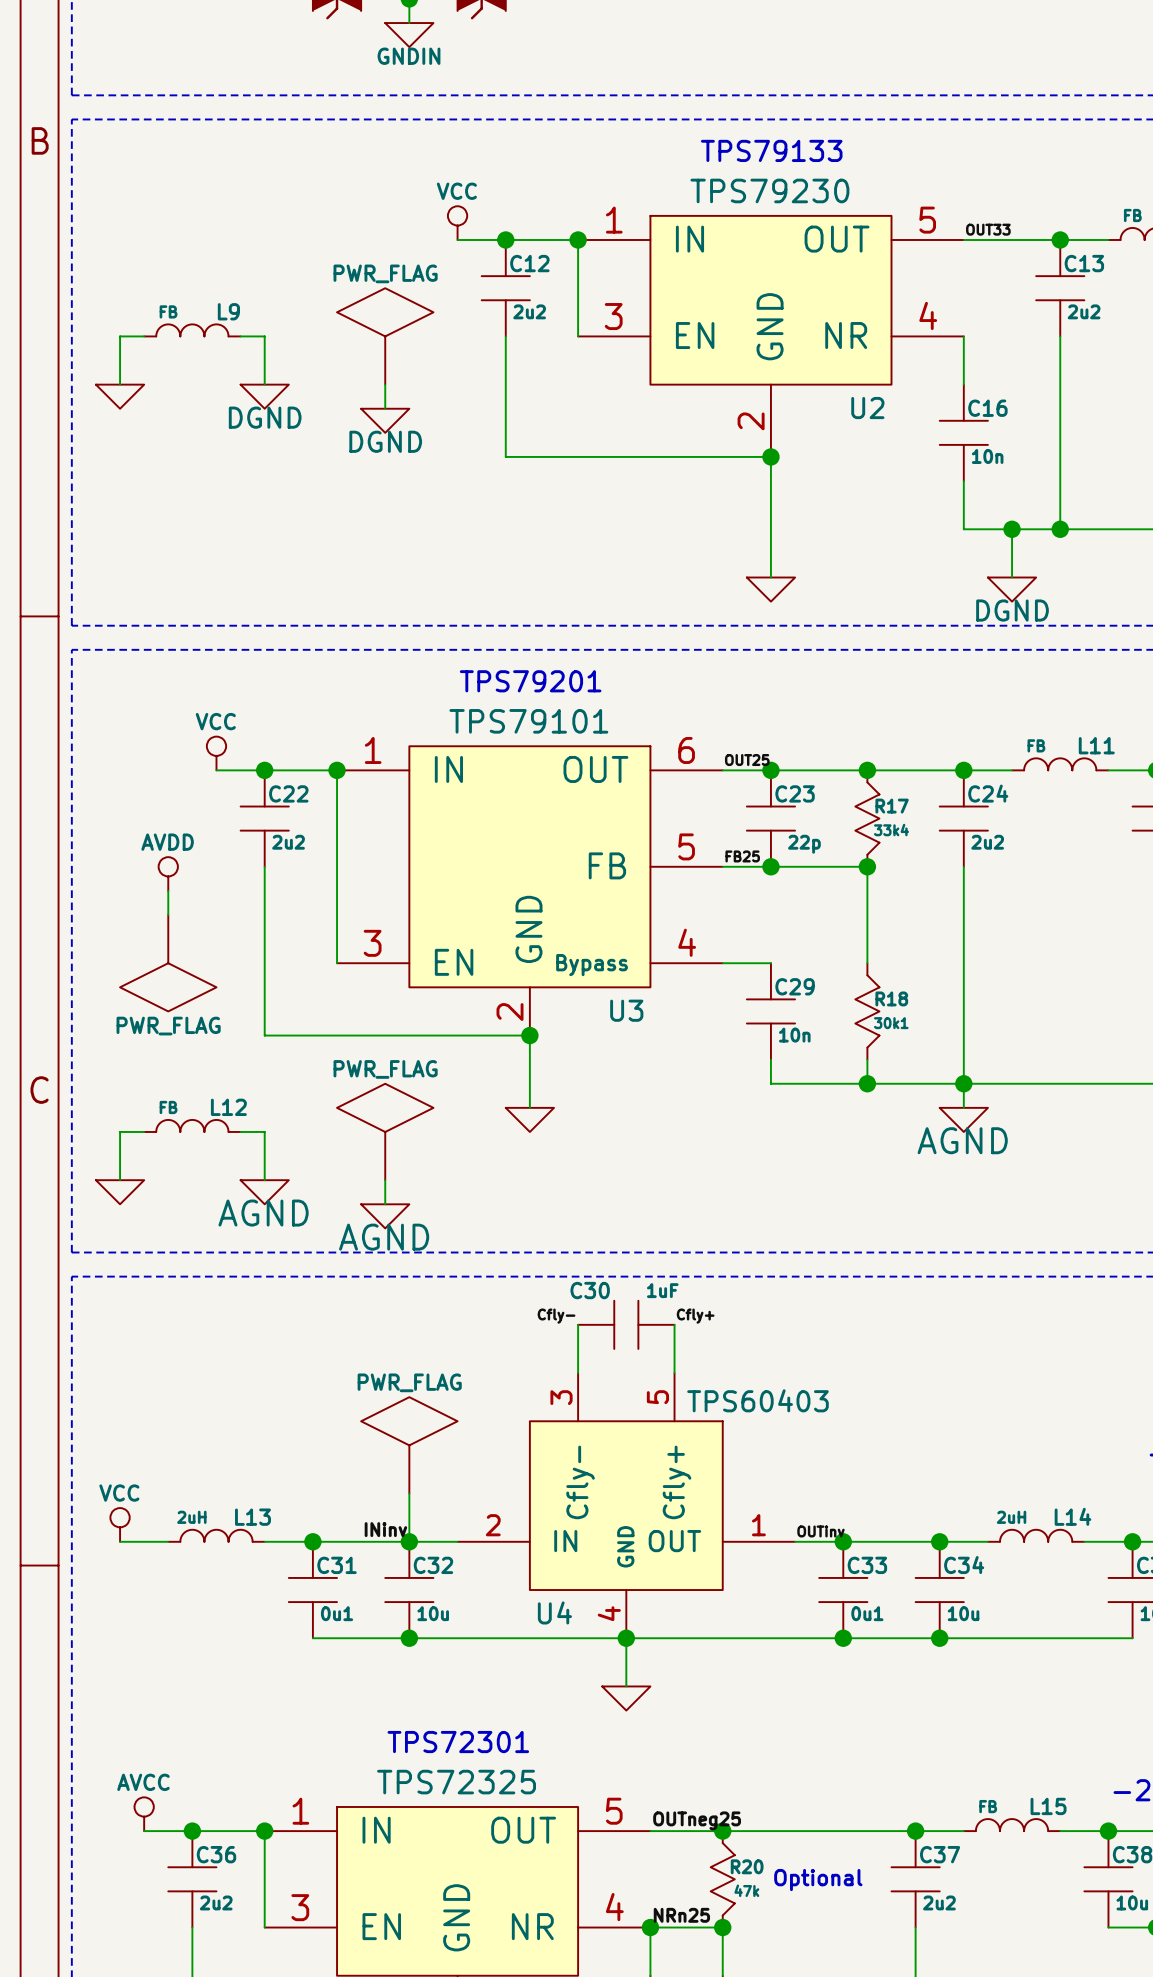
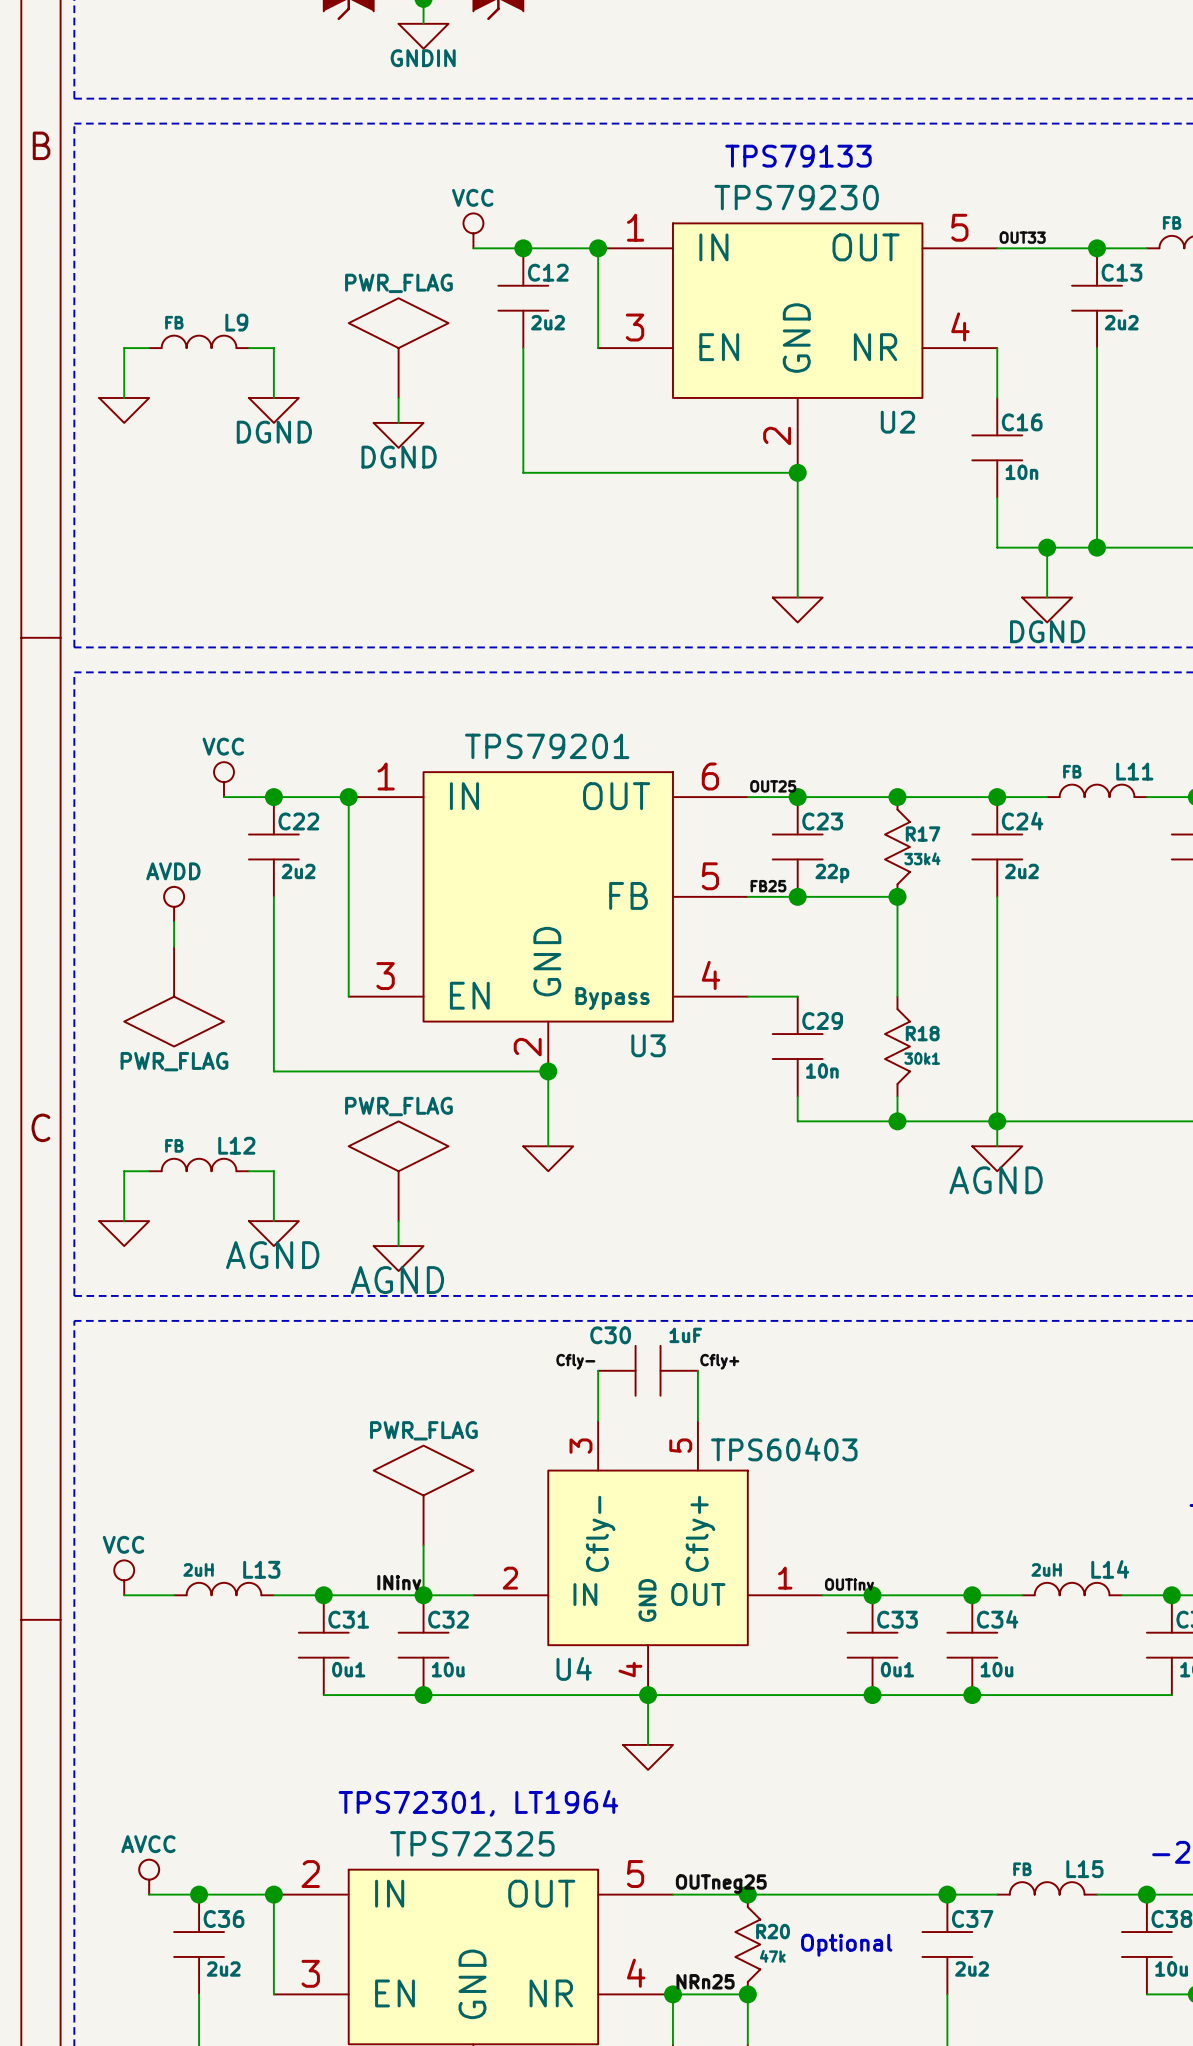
text: TPS79201 (530, 681) -> none
U3 value: TPS79101 (528, 721) -> TPS79201 (547, 746)
text: TPS72301 (458, 1742) -> TPS72301, LT1964 (478, 1803)
part pin number: 1 (300, 1811) -> 2 (310, 1874)

